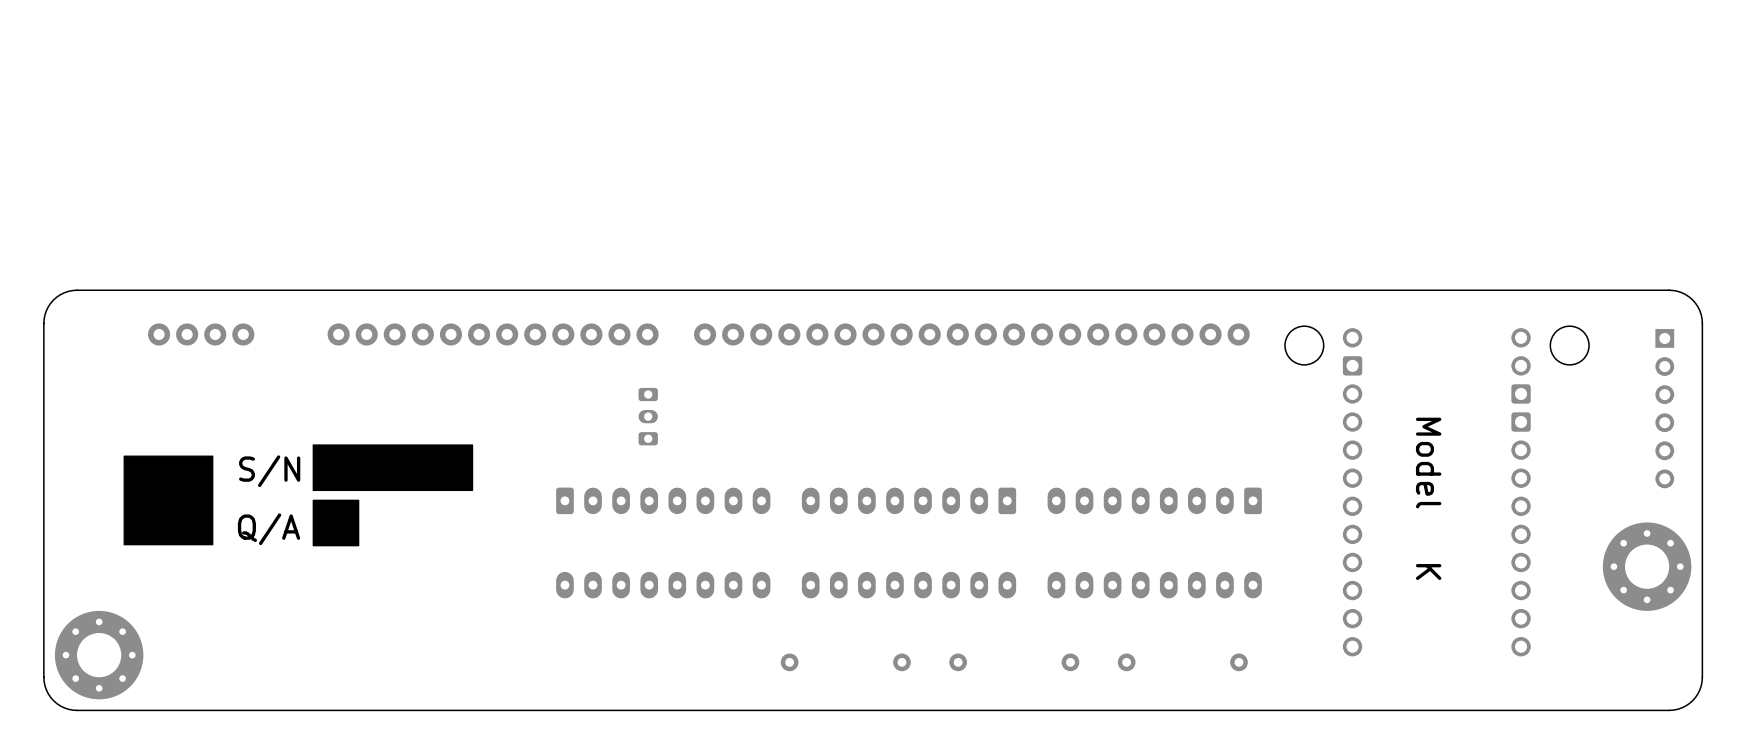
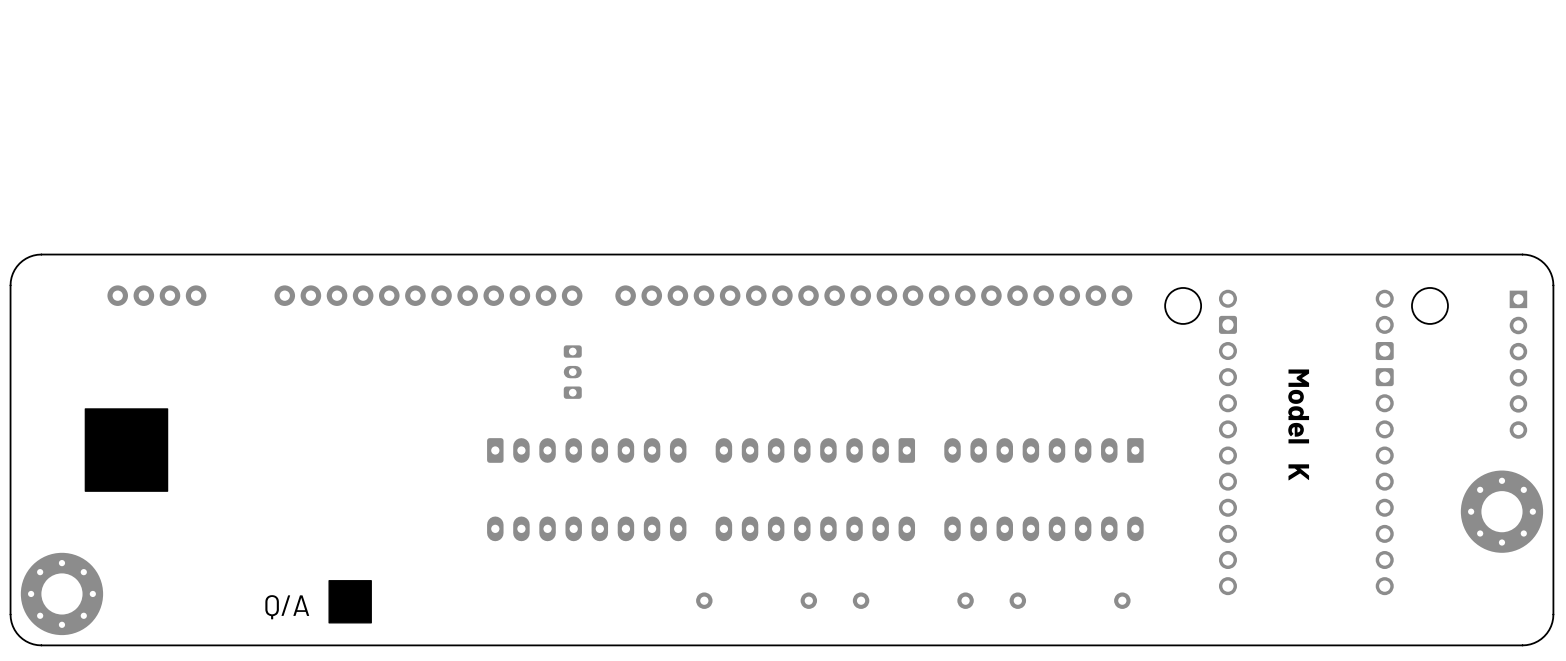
drawing: [312, 444, 474, 492] -> none
text: S/N (269, 471) -> none
drawing position: (335, 522) -> (350, 601)
text position: Q/A (269, 529) -> Q/A (287, 607)

